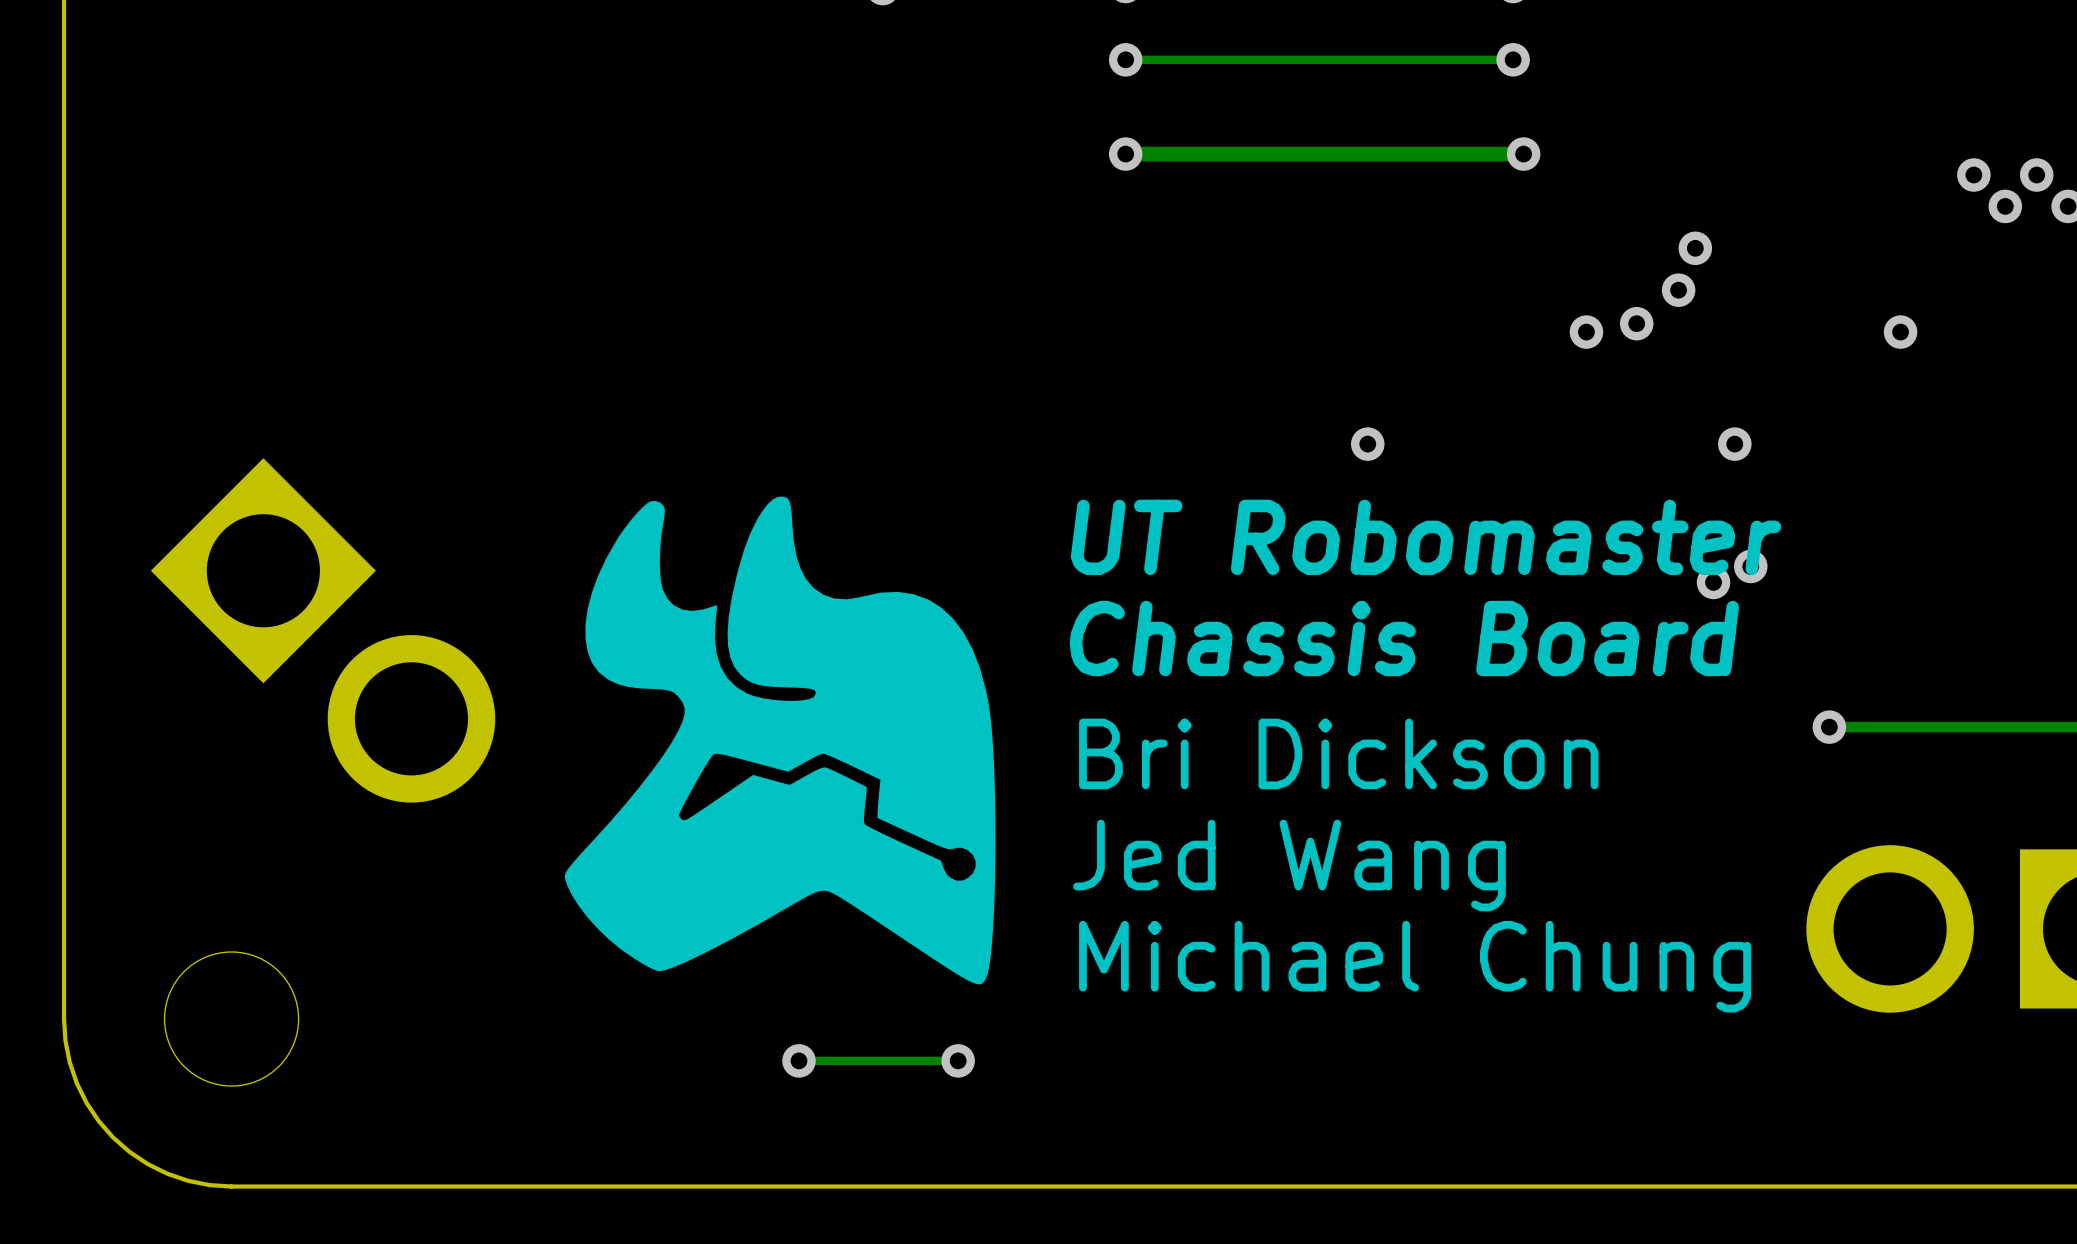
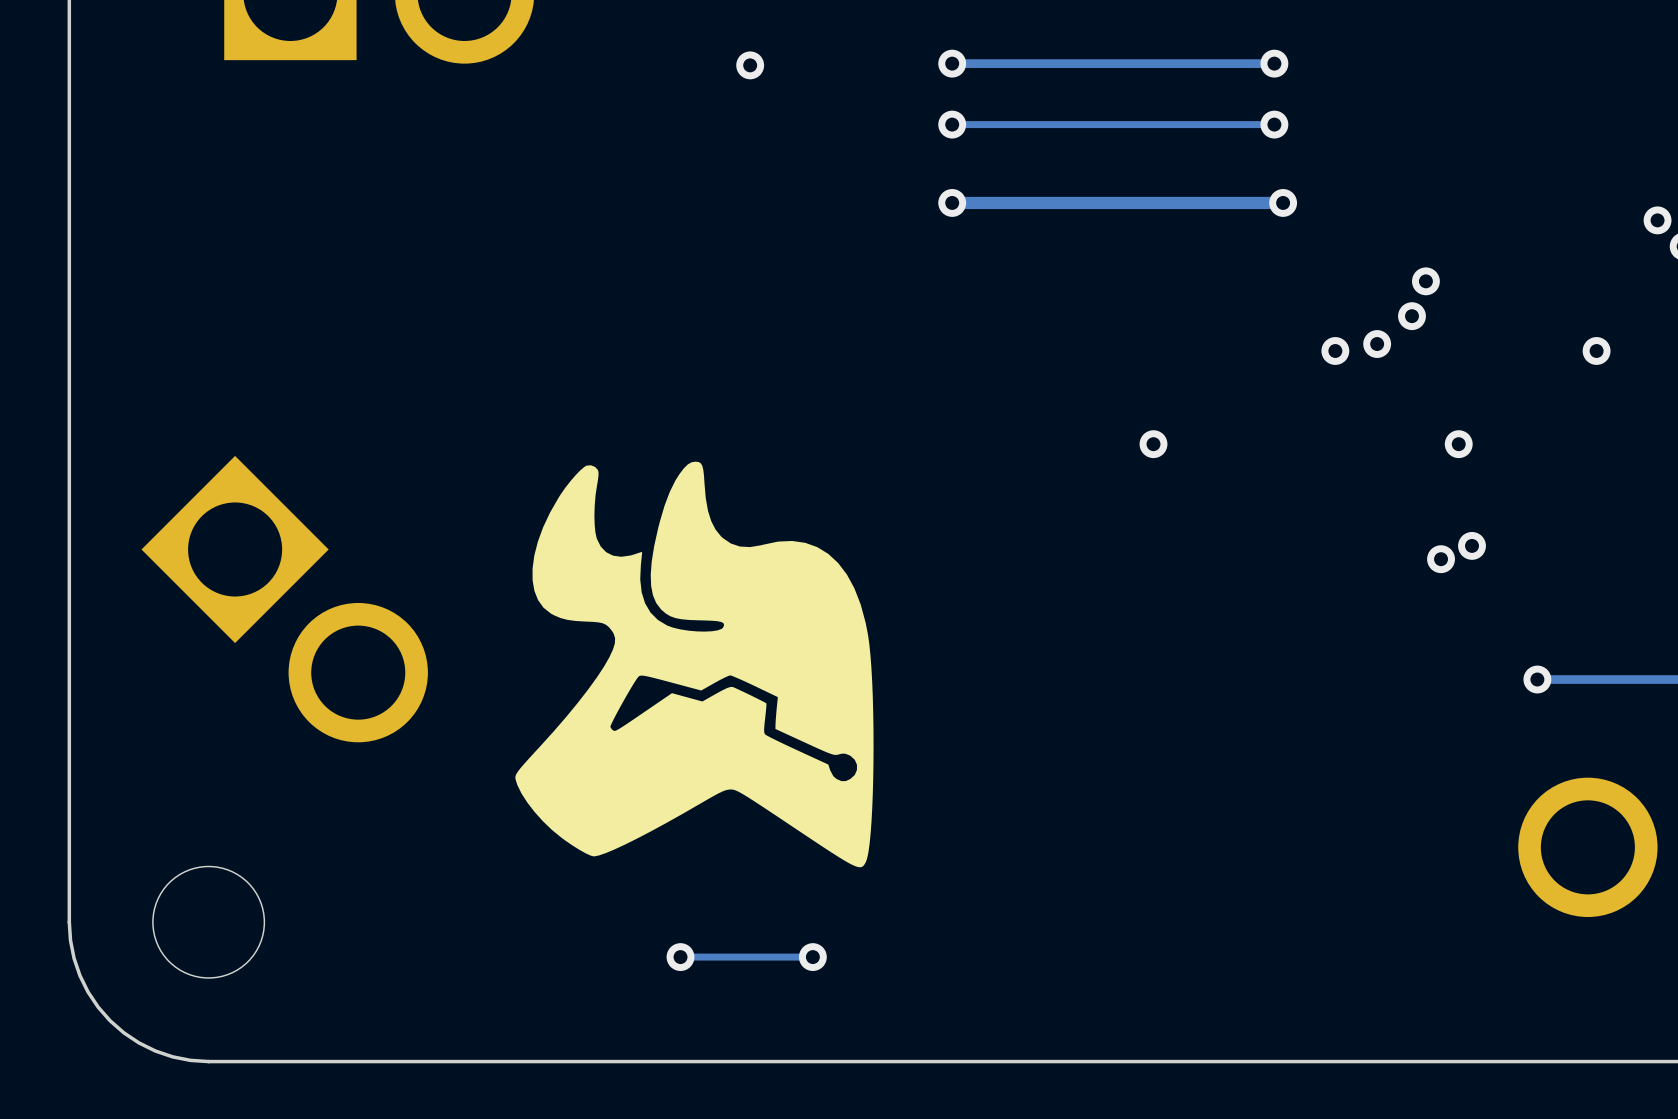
text: UT Robomaster (1426, 537) -> none
text: Chassis Board (1404, 638) -> none
drawing position: (780, 740) -> (694, 664)
text: Bri Dickson (1338, 753) -> none
text: Jed Wang (1289, 865) -> none
text: Michael Chung (1415, 966) -> none

